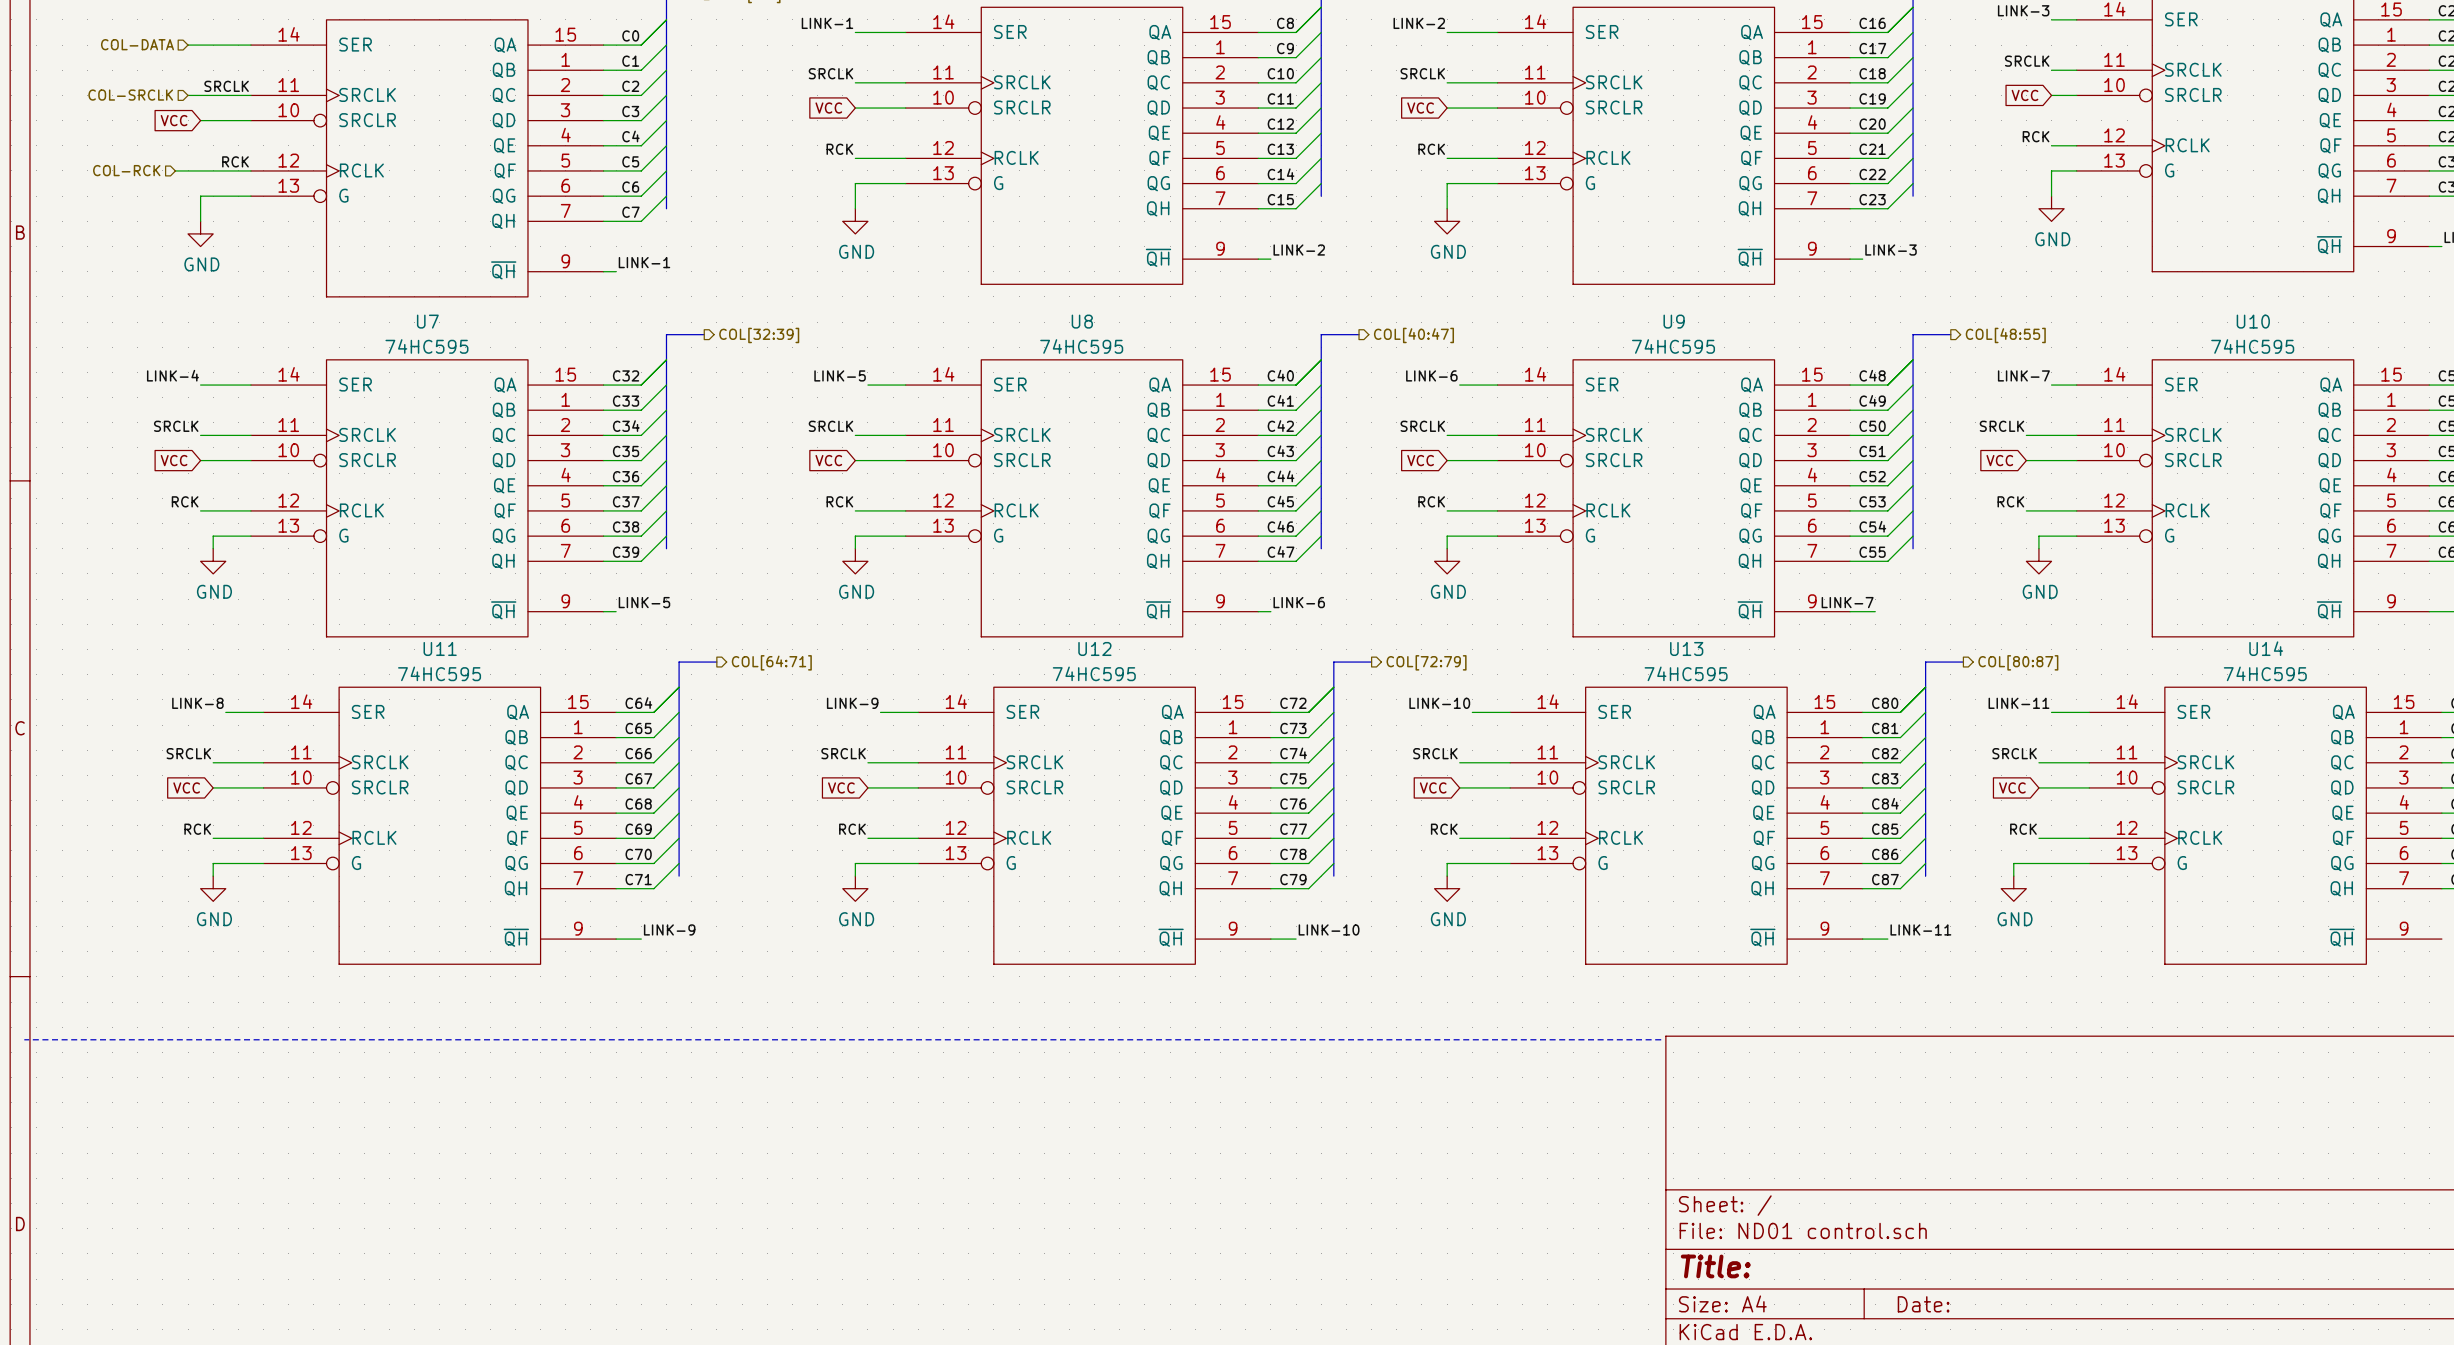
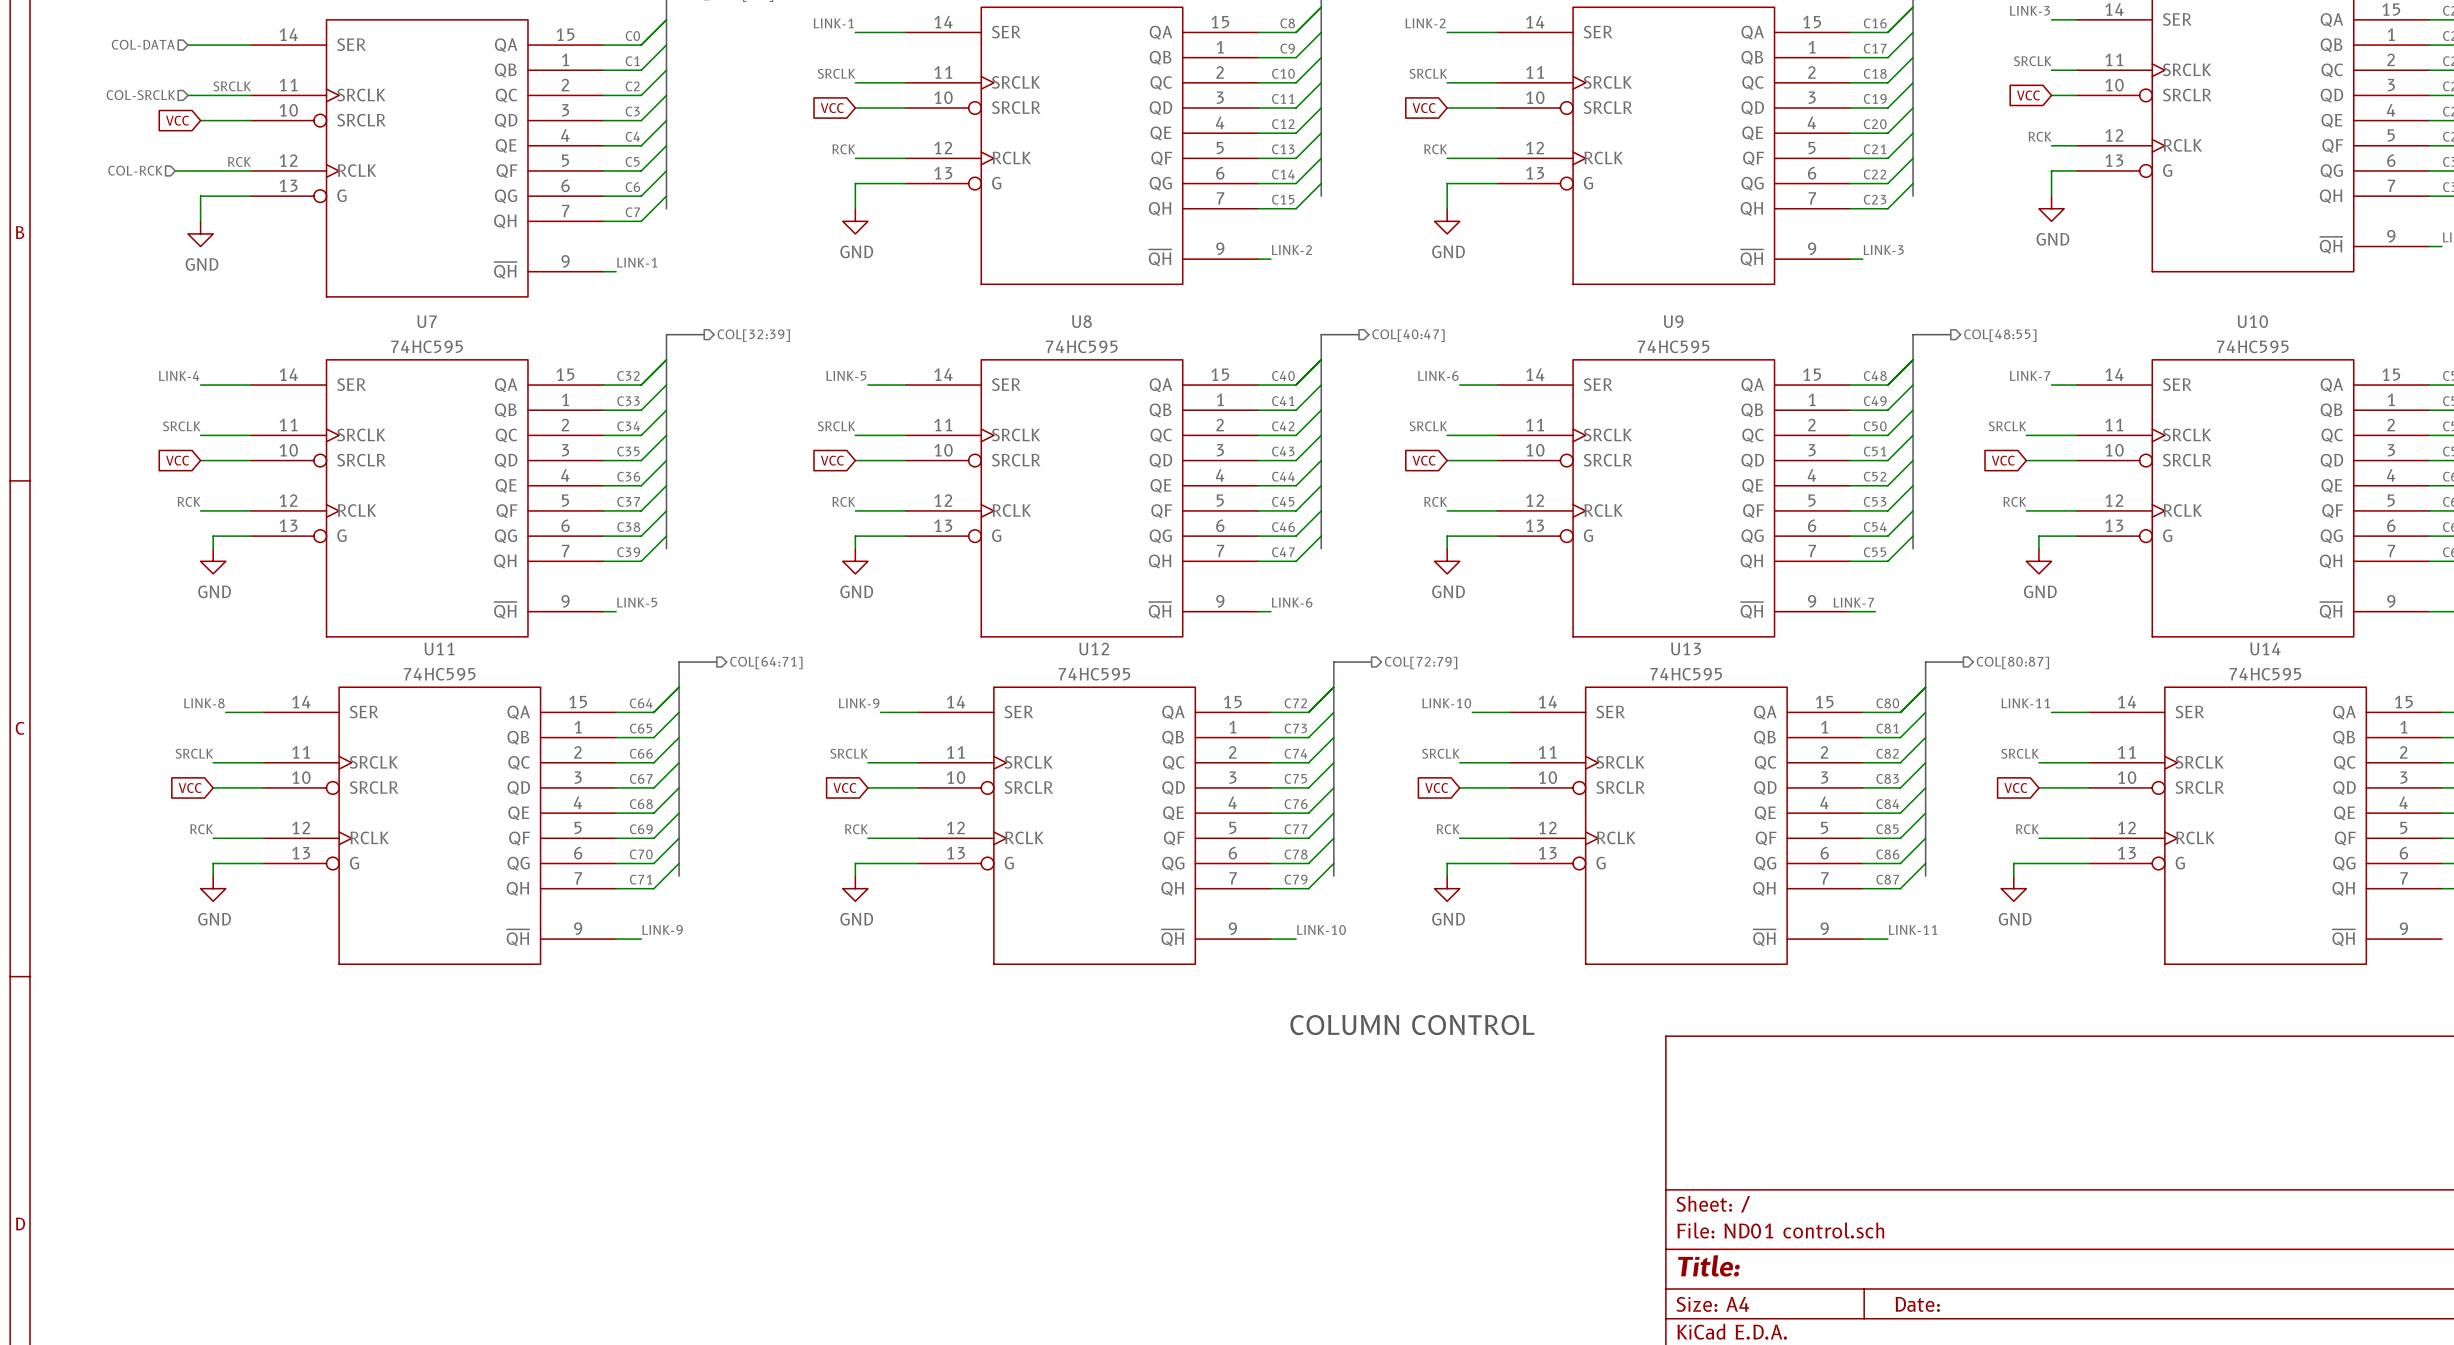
text: none -> COLUMN CONTROL (1412, 1025)
line: (24, 1039) (1661, 1039) -> none

